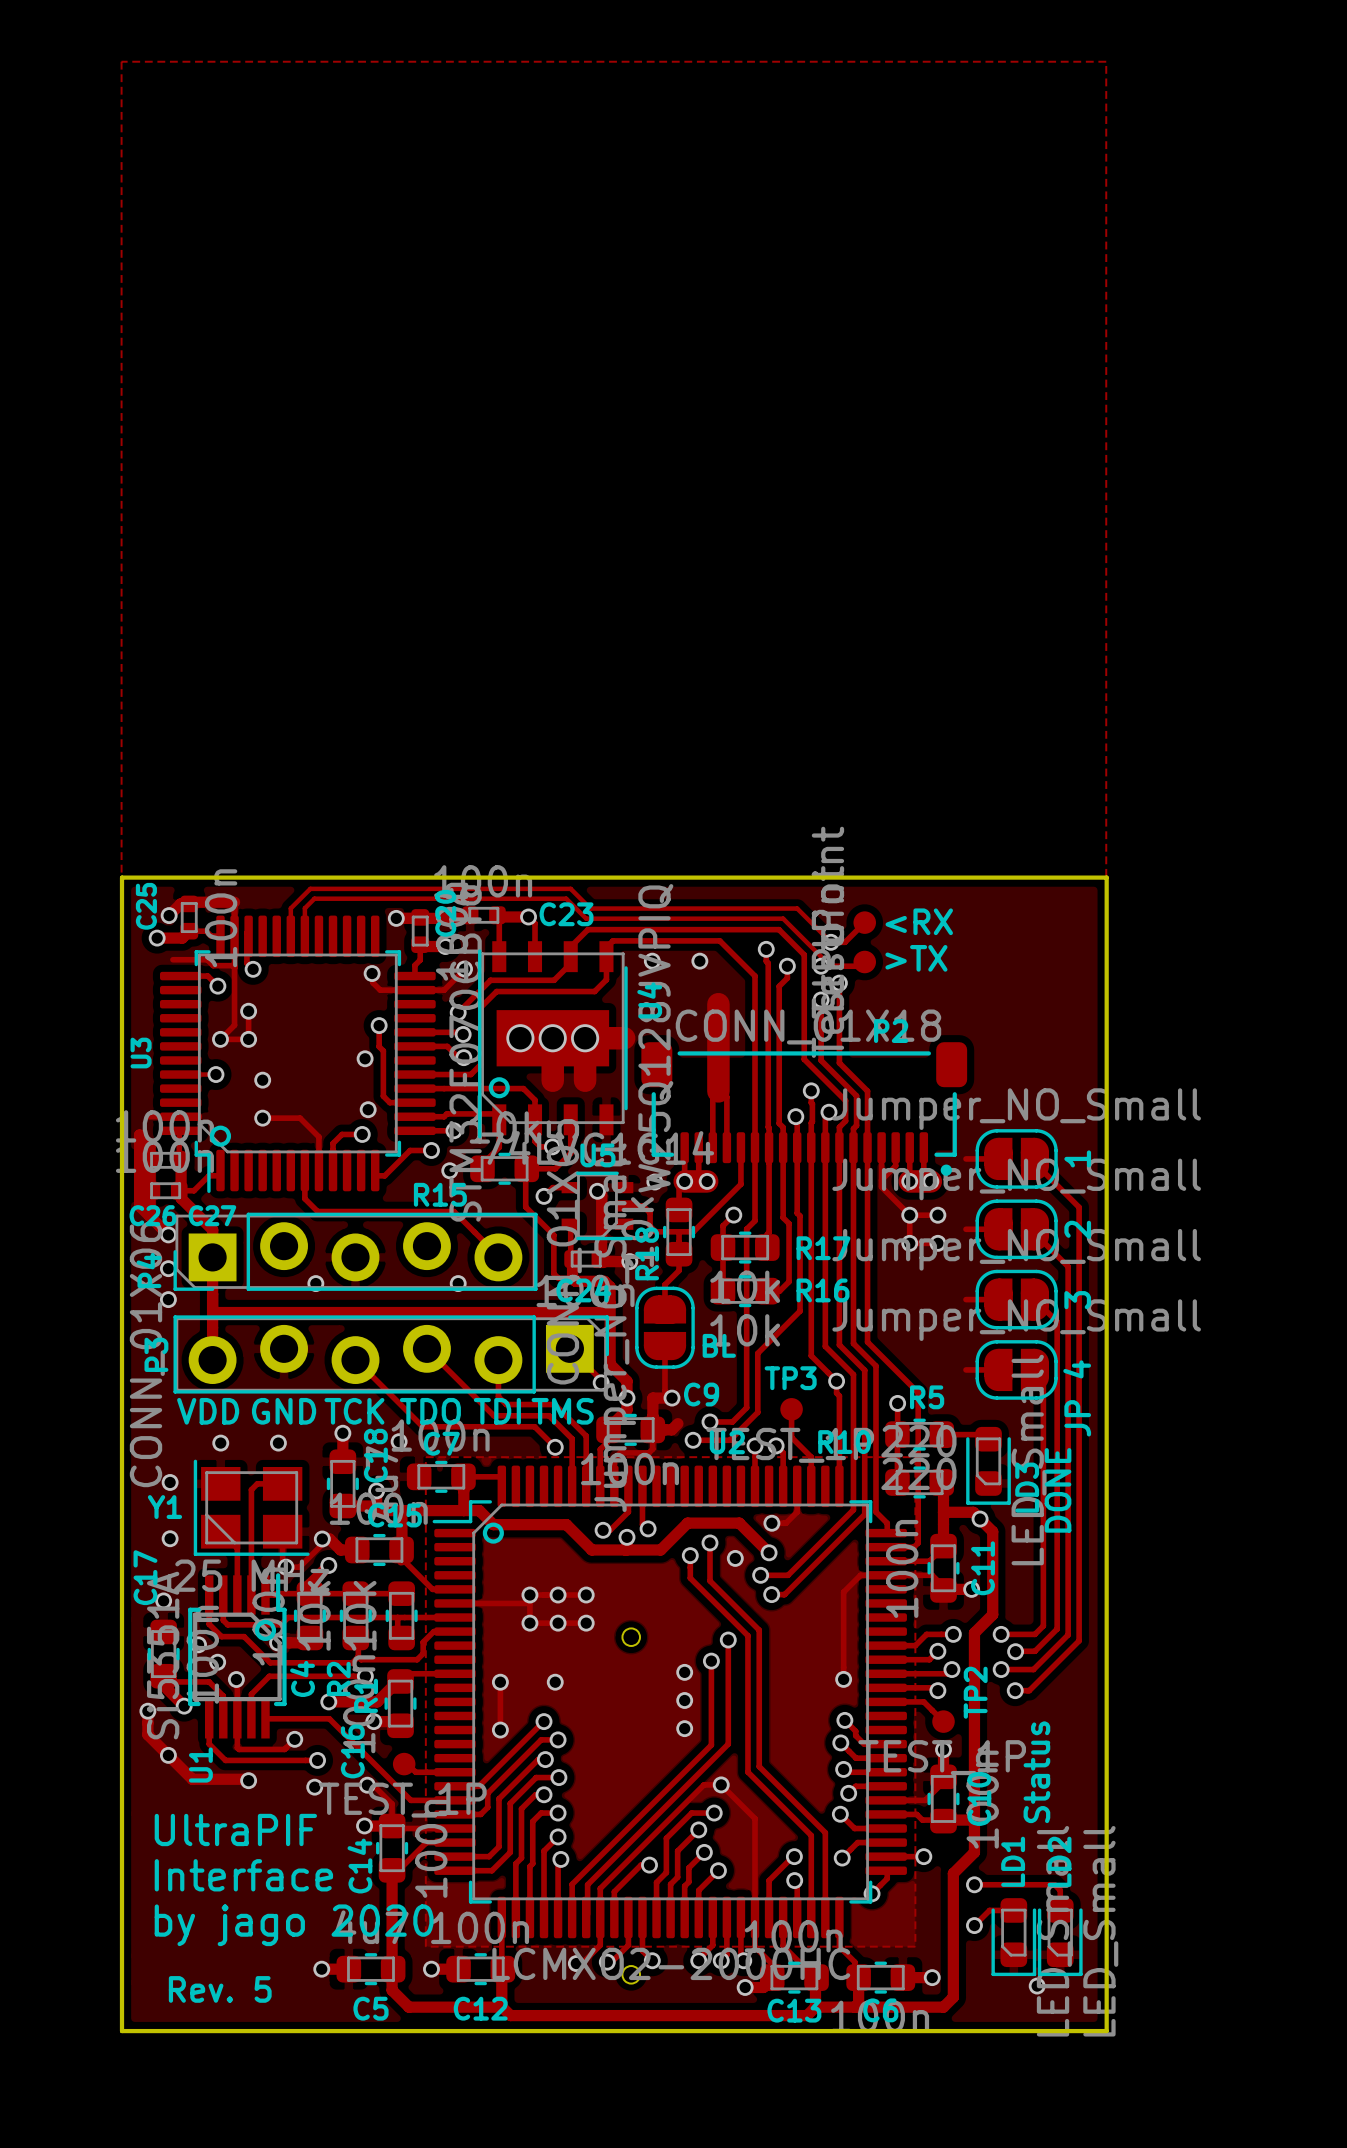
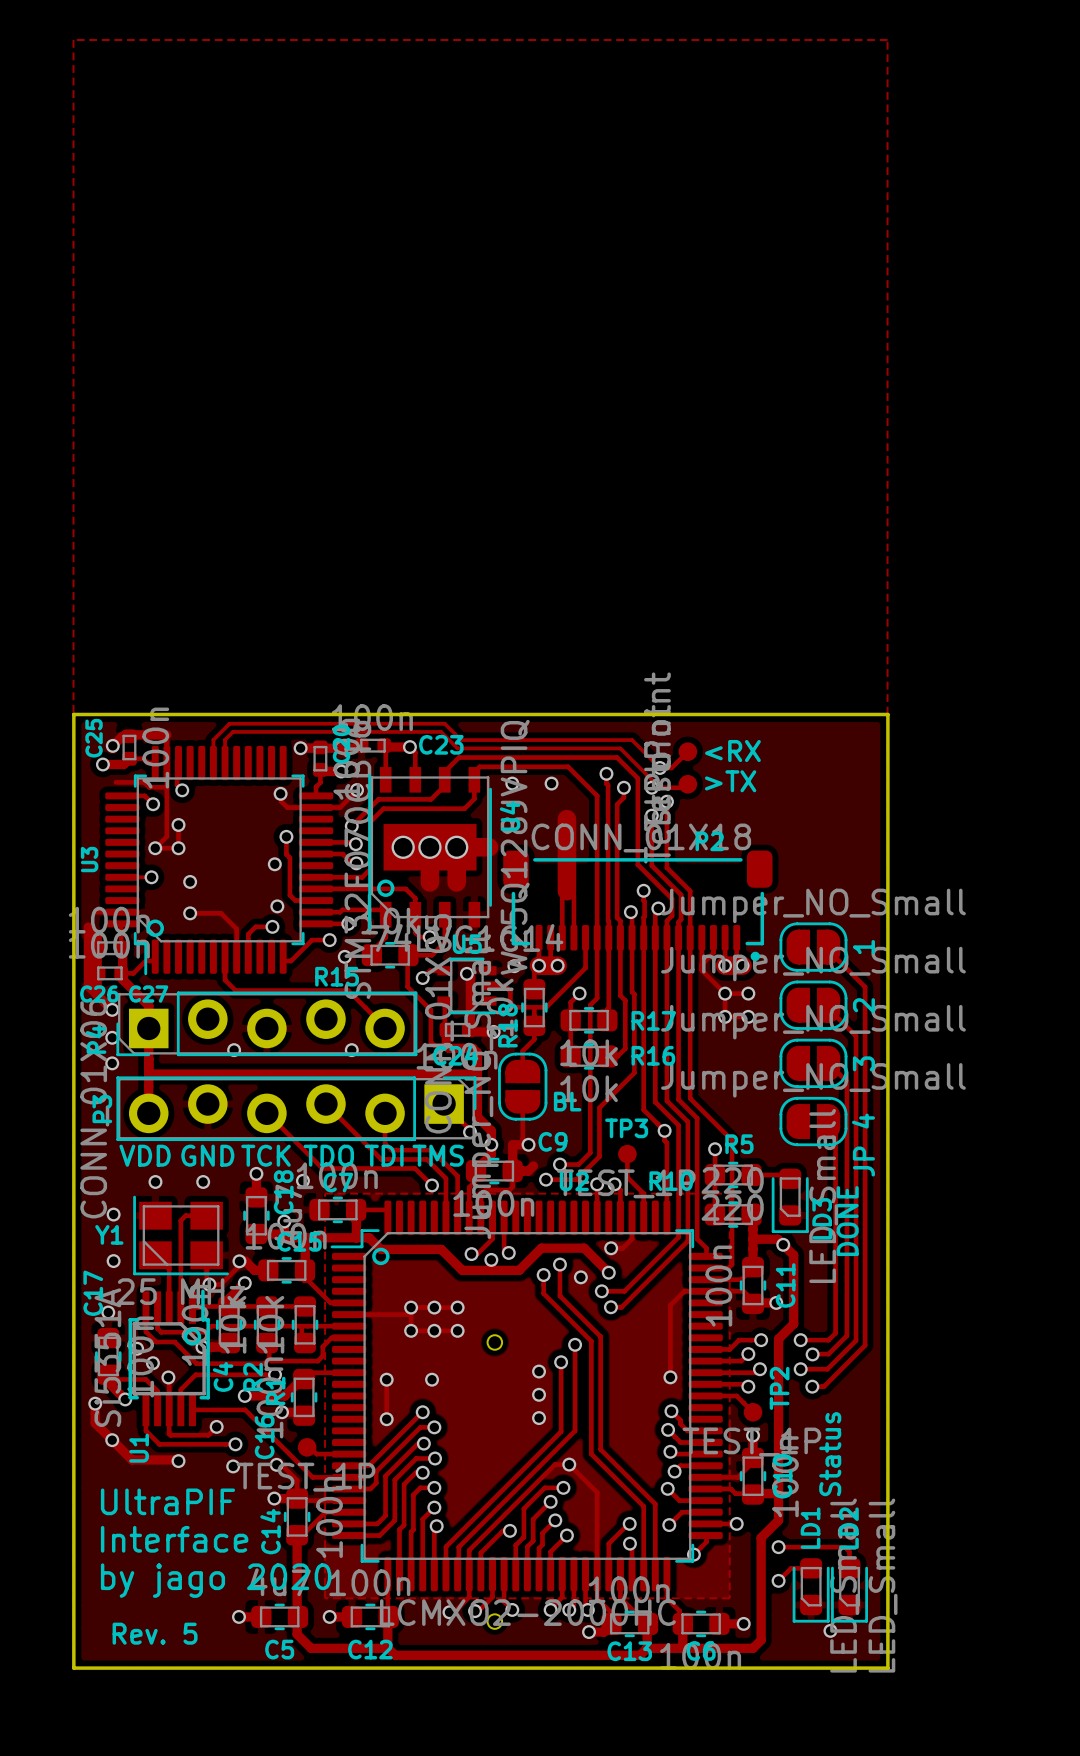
track: (966, 1158) (998, 1158) -> none
track: (966, 1229) (998, 1229) -> none
track: (966, 1299) (998, 1299) -> none
track: (966, 1369) (998, 1369) -> none

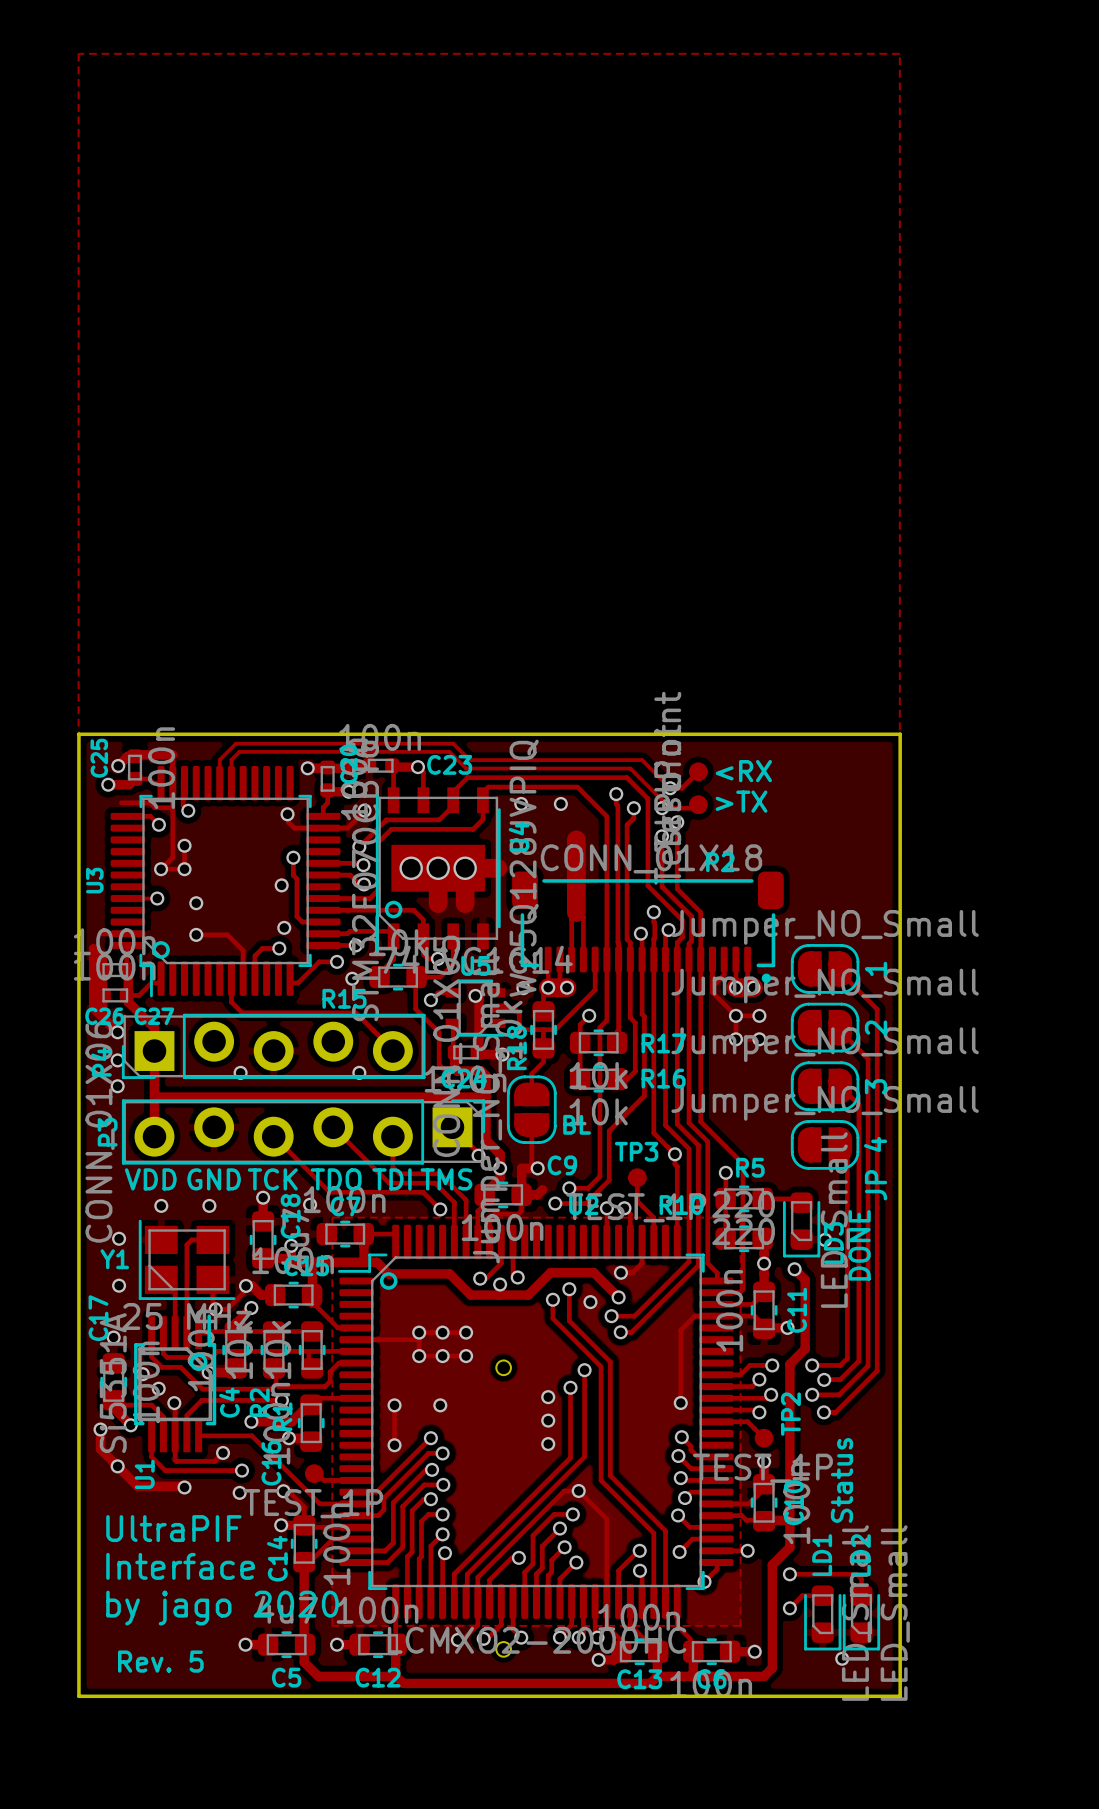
via: none -> (825, 1239)
track: (753, 1239) (777, 1239) (783, 1244) -> none
via: none -> (764, 1263)

